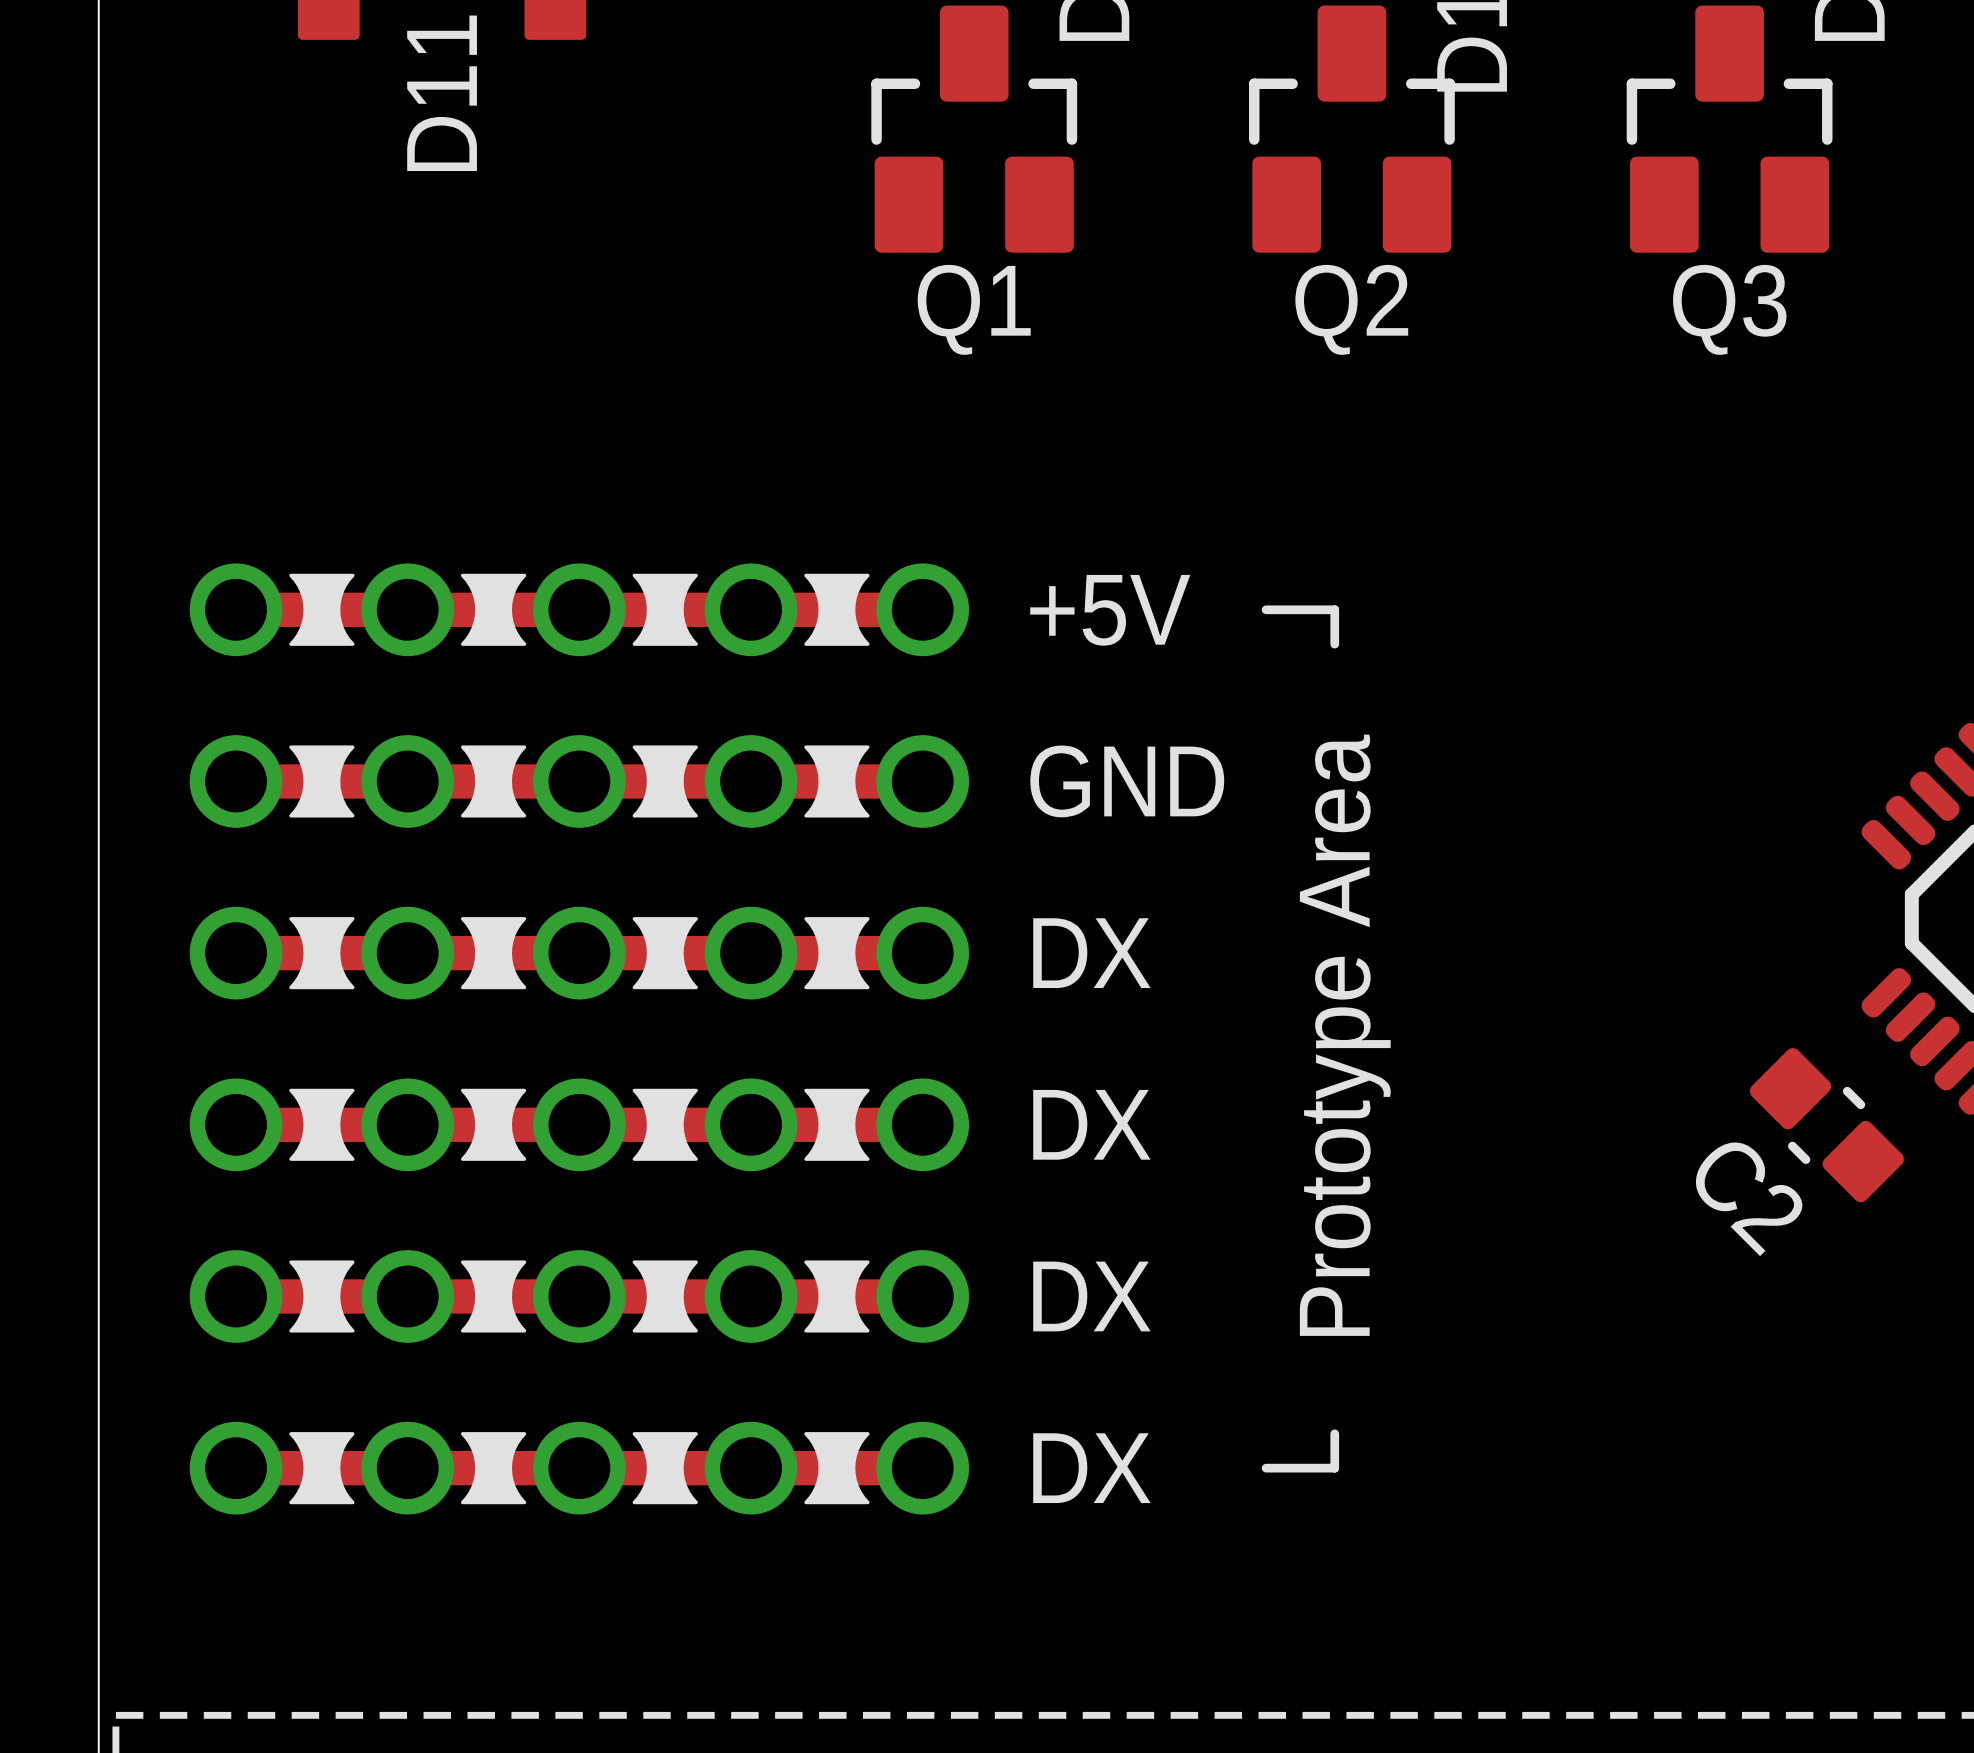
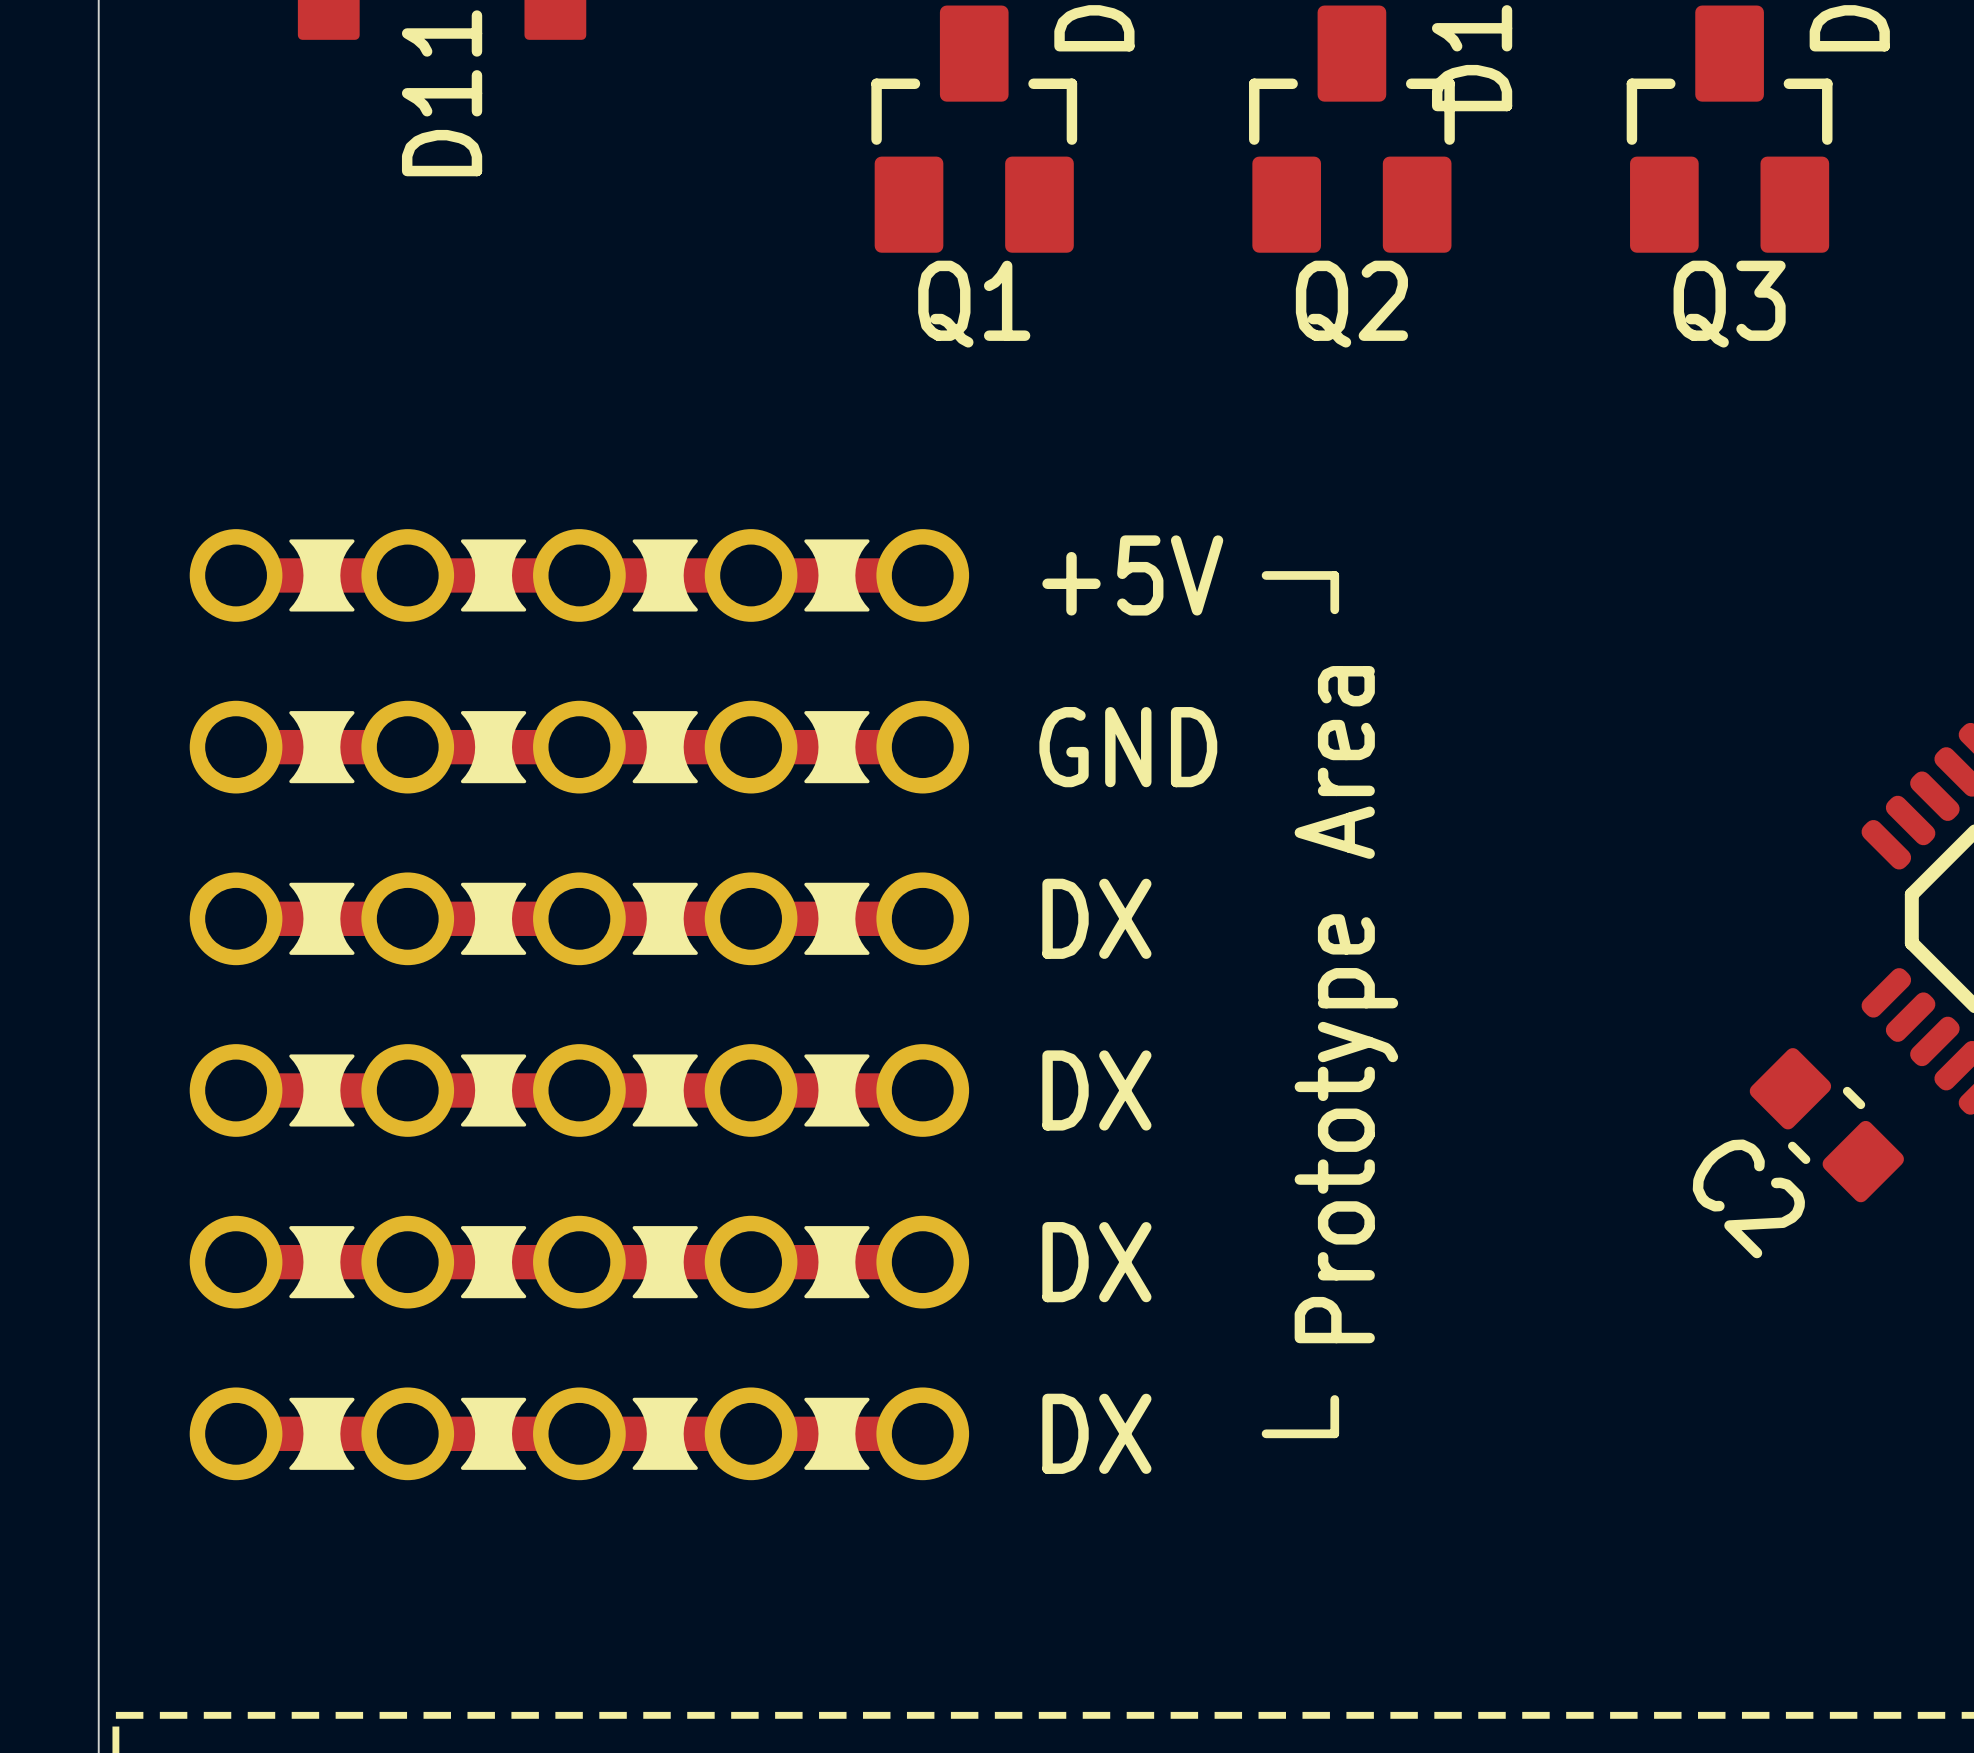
part position: (579, 609) -> (579, 575)
line: (1266, 609) (1334, 609) (1334, 644) -> (1266, 575) (1334, 575) (1334, 609)
text position: +5V (1110, 610) -> +5V (1132, 575)
part position: (579, 781) -> (579, 747)
text position: GND (1127, 781) -> GND (1128, 747)
part position: (579, 953) -> (579, 918)
text position: DX (1091, 953) -> DX (1096, 918)
text position: Prototype Area (1345, 1035) -> Prototype Area (1346, 1004)
part position: (579, 1124) -> (579, 1090)
text position: DX (1091, 1124) -> DX (1096, 1090)
part position: (579, 1296) -> (579, 1262)
text position: DX (1091, 1296) -> DX (1096, 1262)
line: (1334, 1433) (1334, 1468) (1266, 1468) -> (1334, 1399) (1334, 1433) (1266, 1433)
part position: (579, 1468) -> (579, 1433)
text position: DX (1091, 1468) -> DX (1096, 1433)

